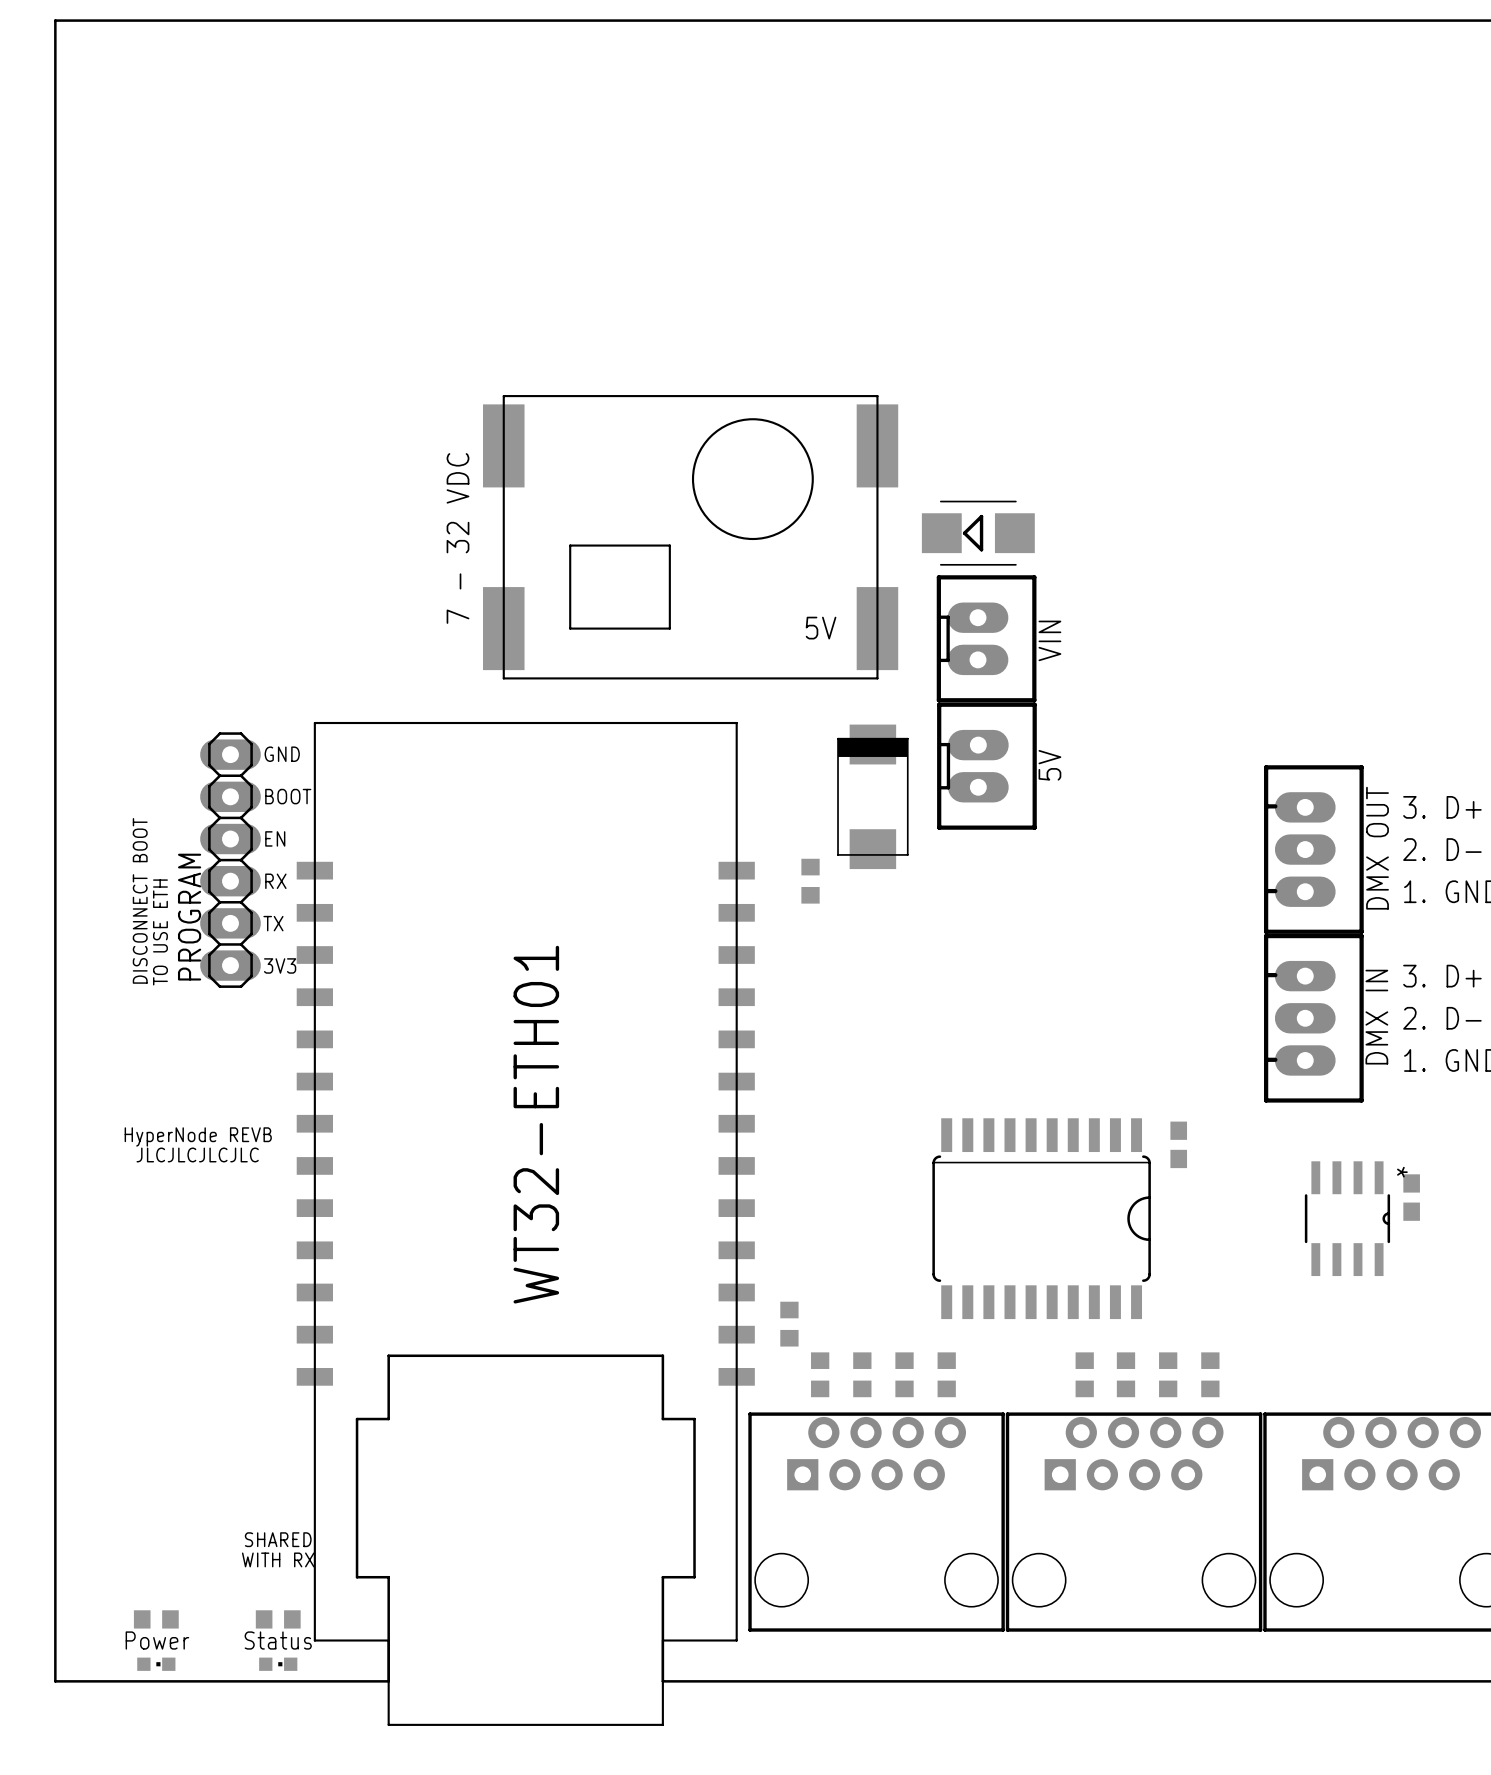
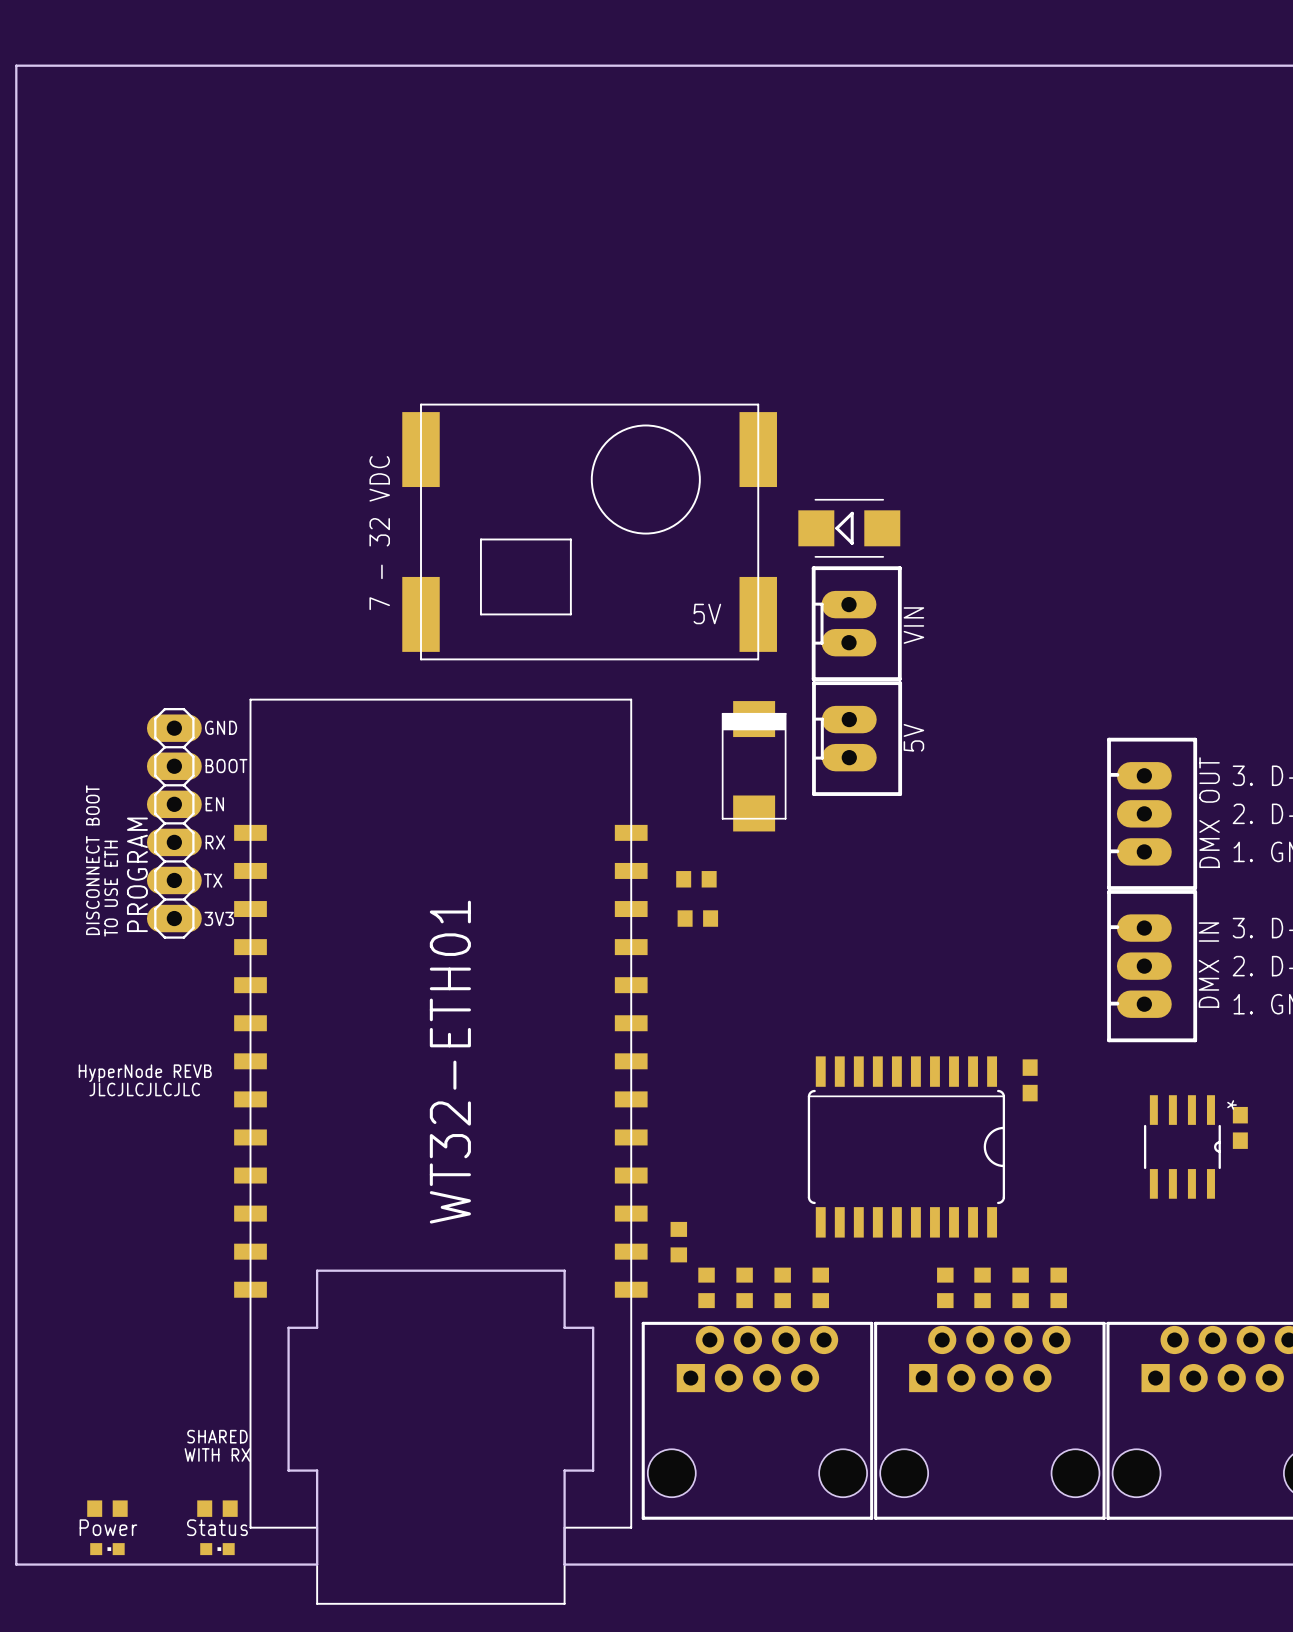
part rotation: 0° (810, 881) -> 90° clockwise (696, 879)
part position: (810, 881) -> (696, 879)
part: none -> (697, 918)

